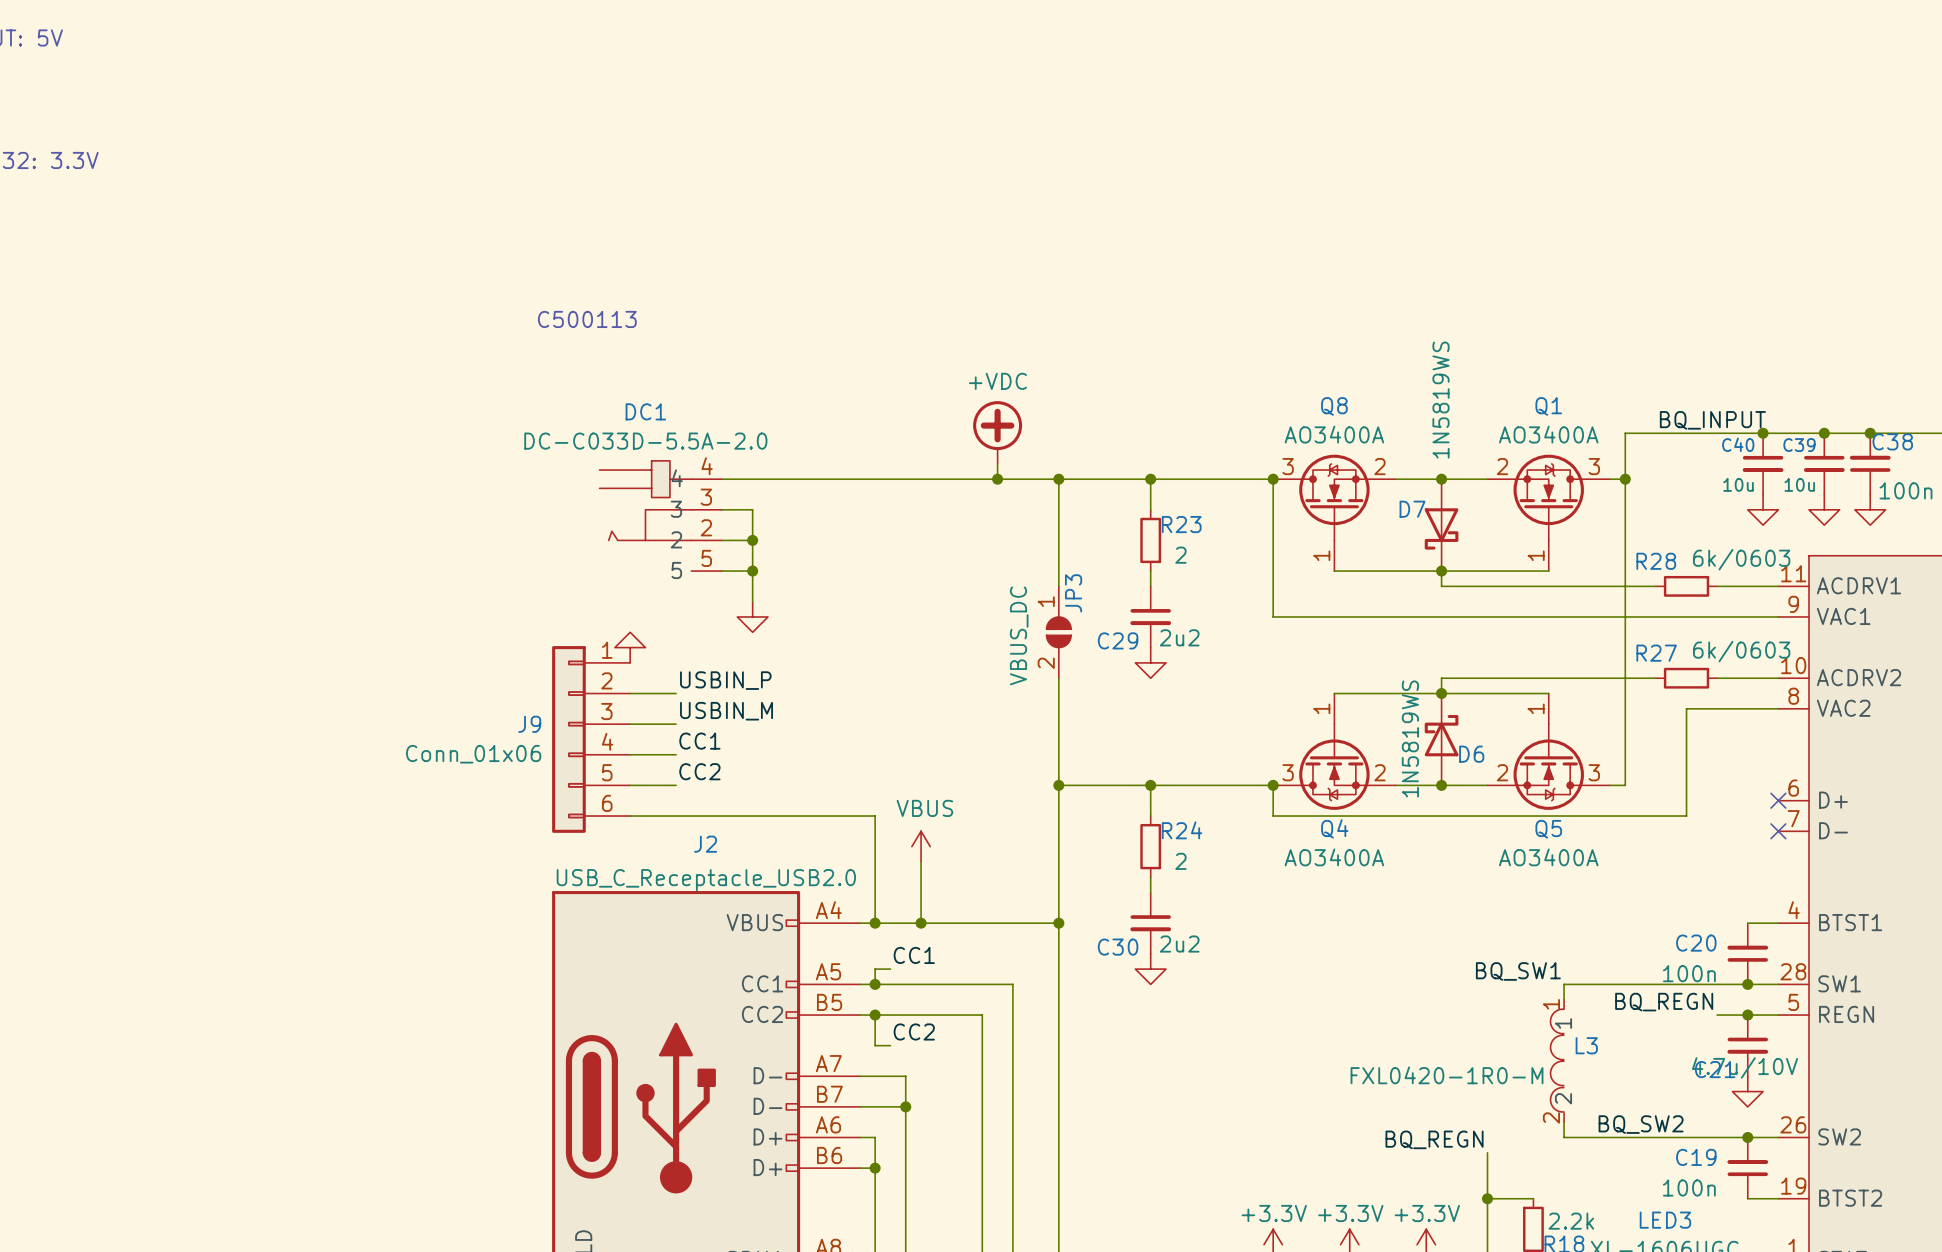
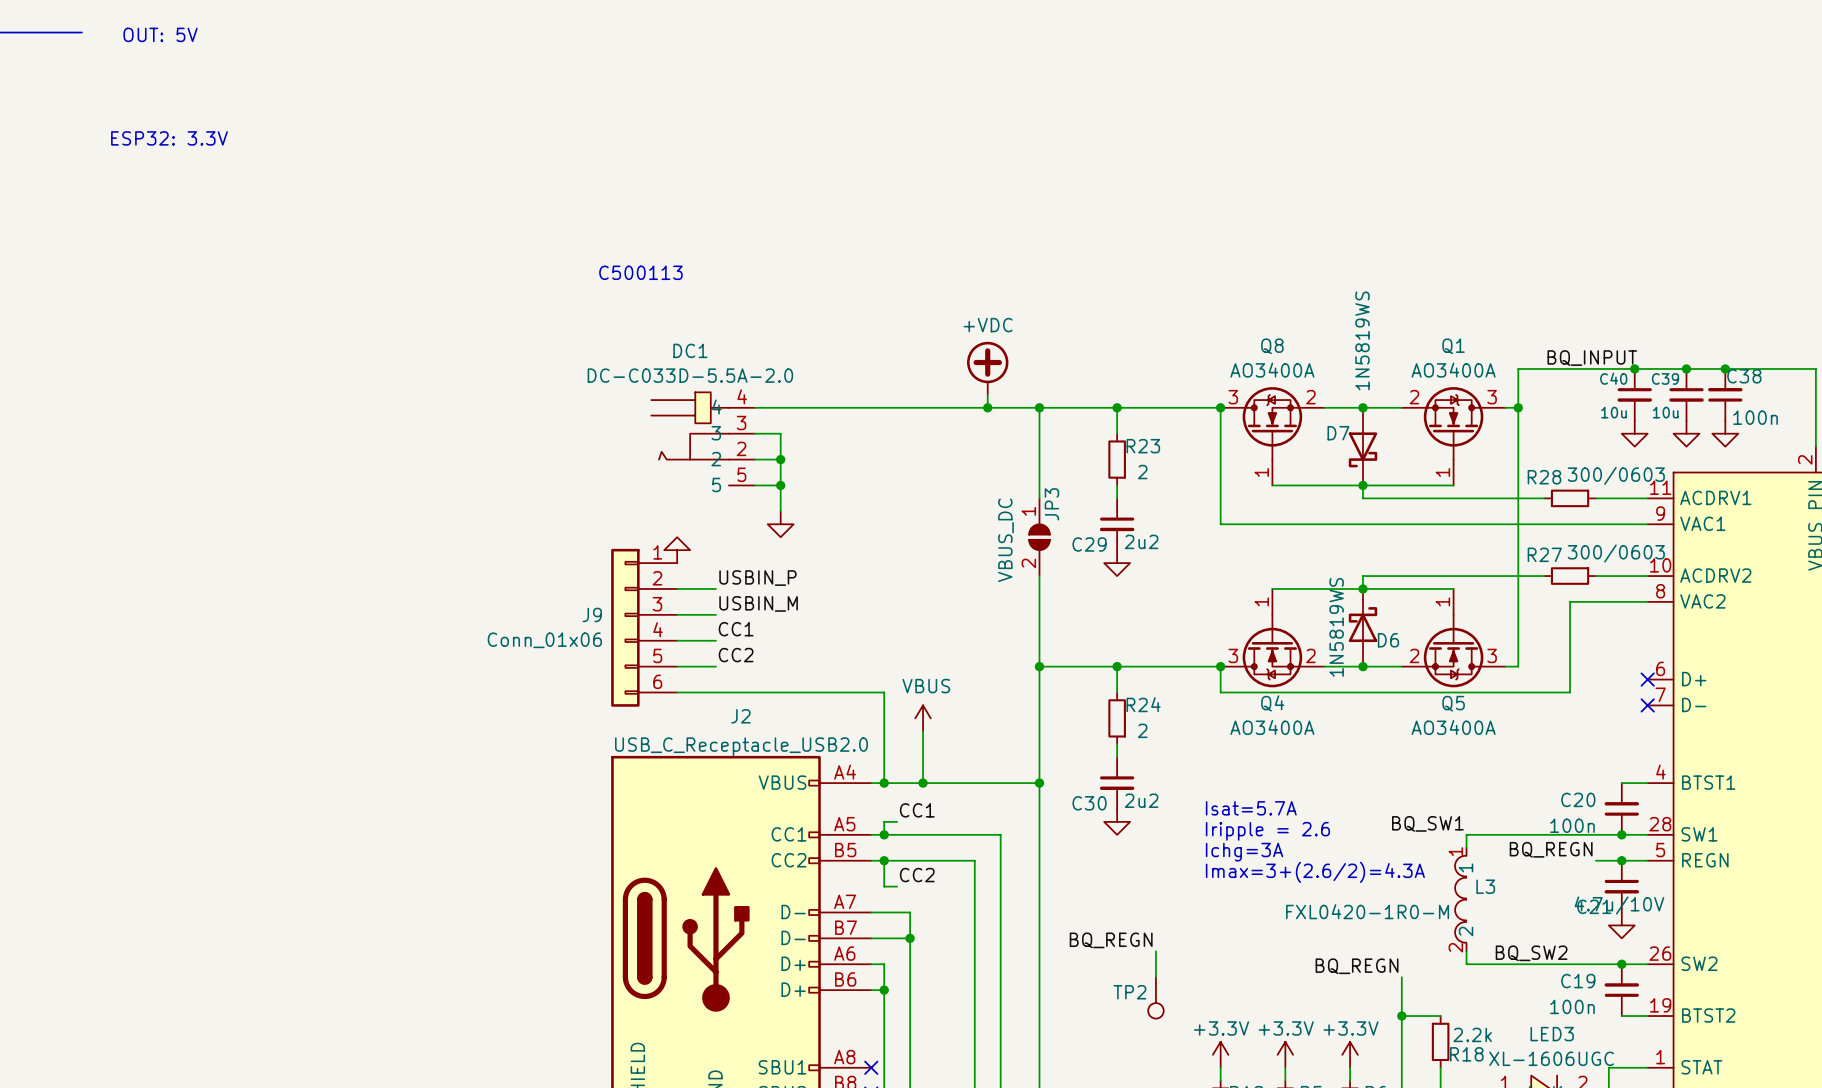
R28 value: 6k/0603 (1741, 559) -> 300/0603 (1616, 475)
R27 value: 6k/0603 (1741, 651) -> 300/0603 (1616, 553)
text: none -> Isat=5.7A (1251, 808)
text: none -> Iripple = 2.6 (1267, 831)
text: none -> Ichg=3A (1244, 852)
text: none -> Imax=3+(2.6/2)=4.3A (1315, 872)
label: none -> BQ_REGN (1111, 940)
wire: none -> (1155, 951) (1155, 977)
TP2: none -> (1155, 997)

